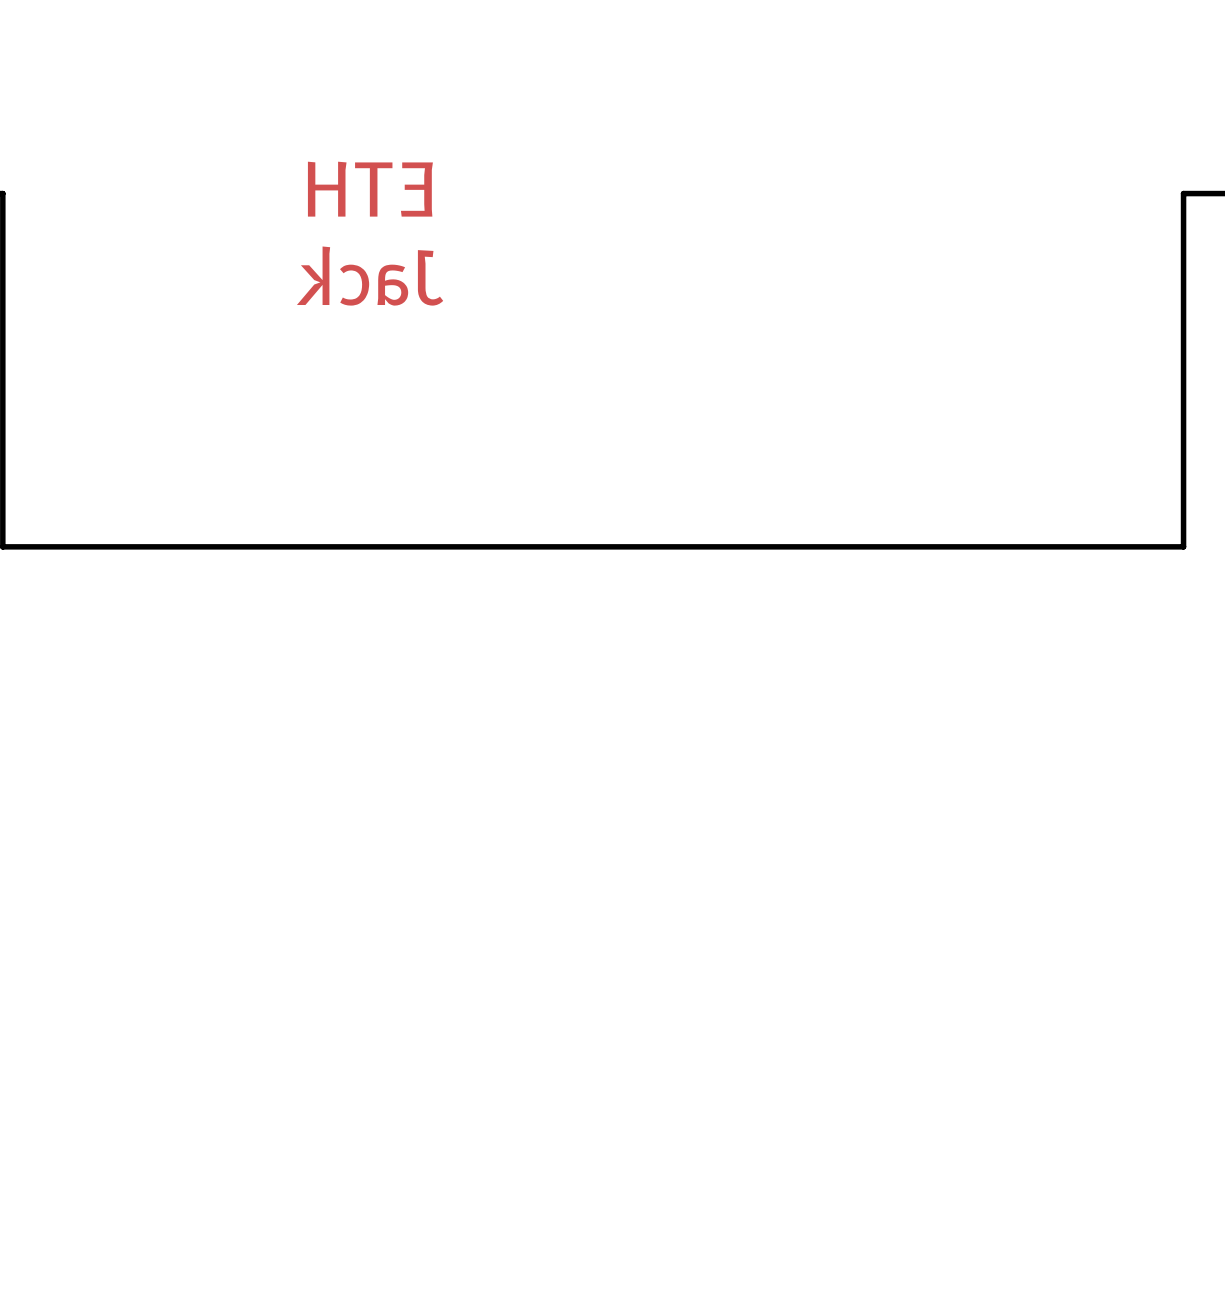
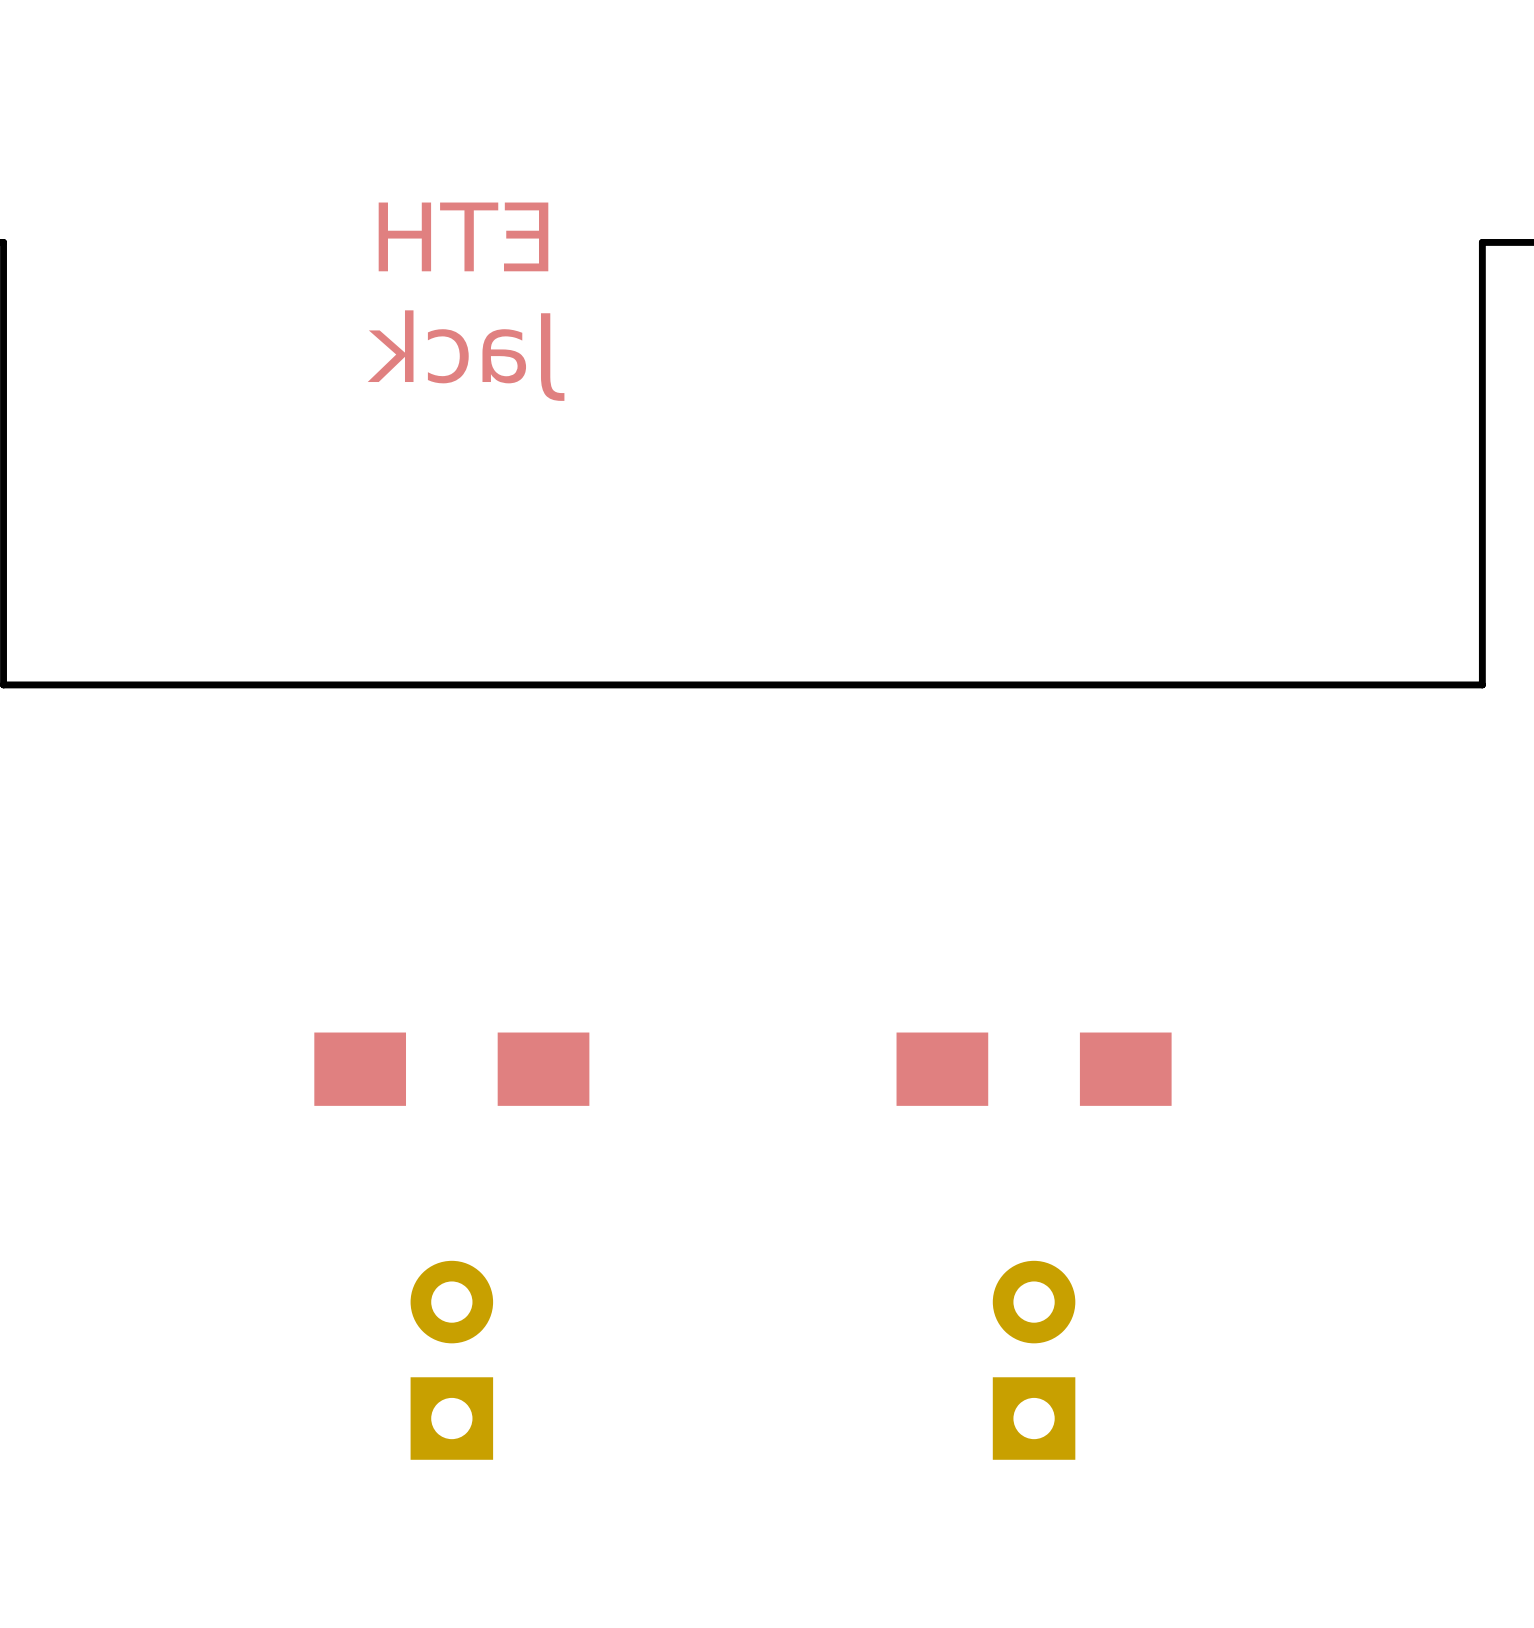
part: none -> (451, 1069)
part: none -> (1034, 1069)
part: none -> (451, 1360)
part: none -> (1034, 1360)

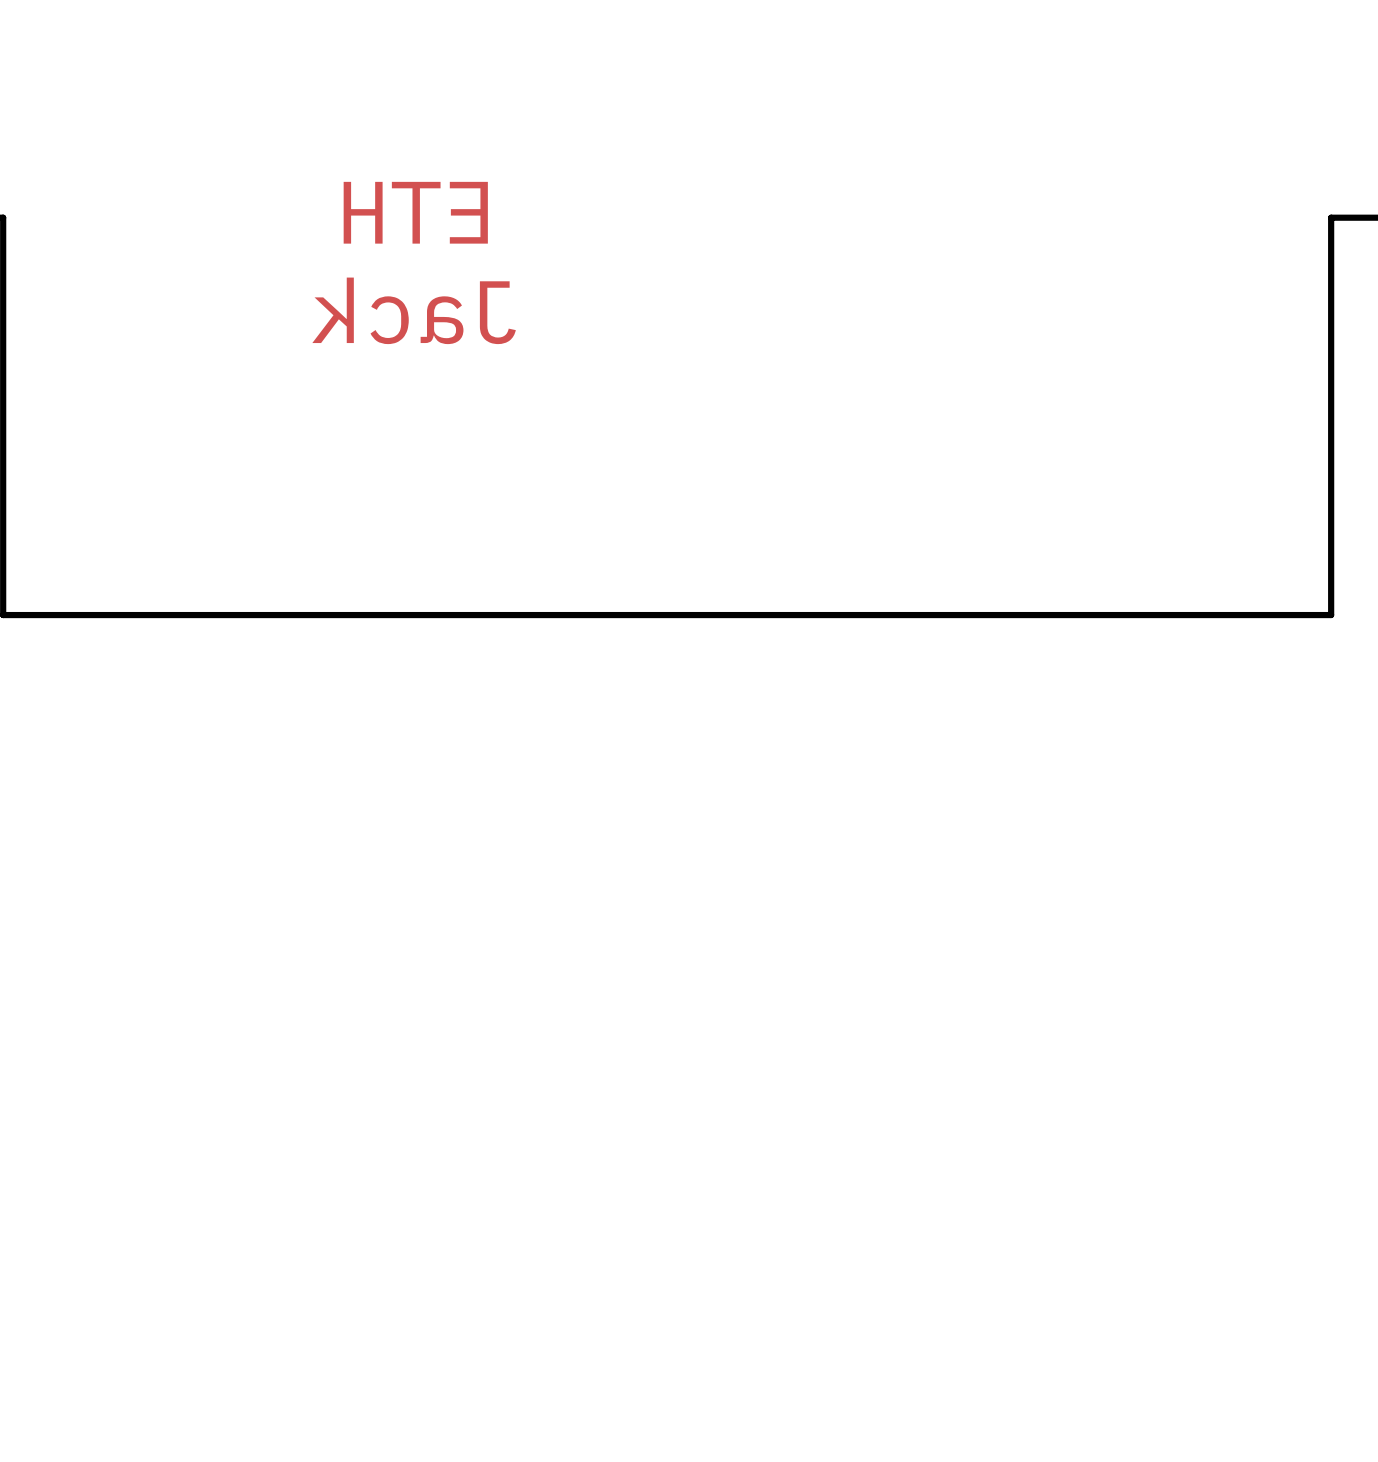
part: (451, 1069) -> none
part: (1034, 1069) -> none
part: (451, 1360) -> none
part: (1034, 1360) -> none

